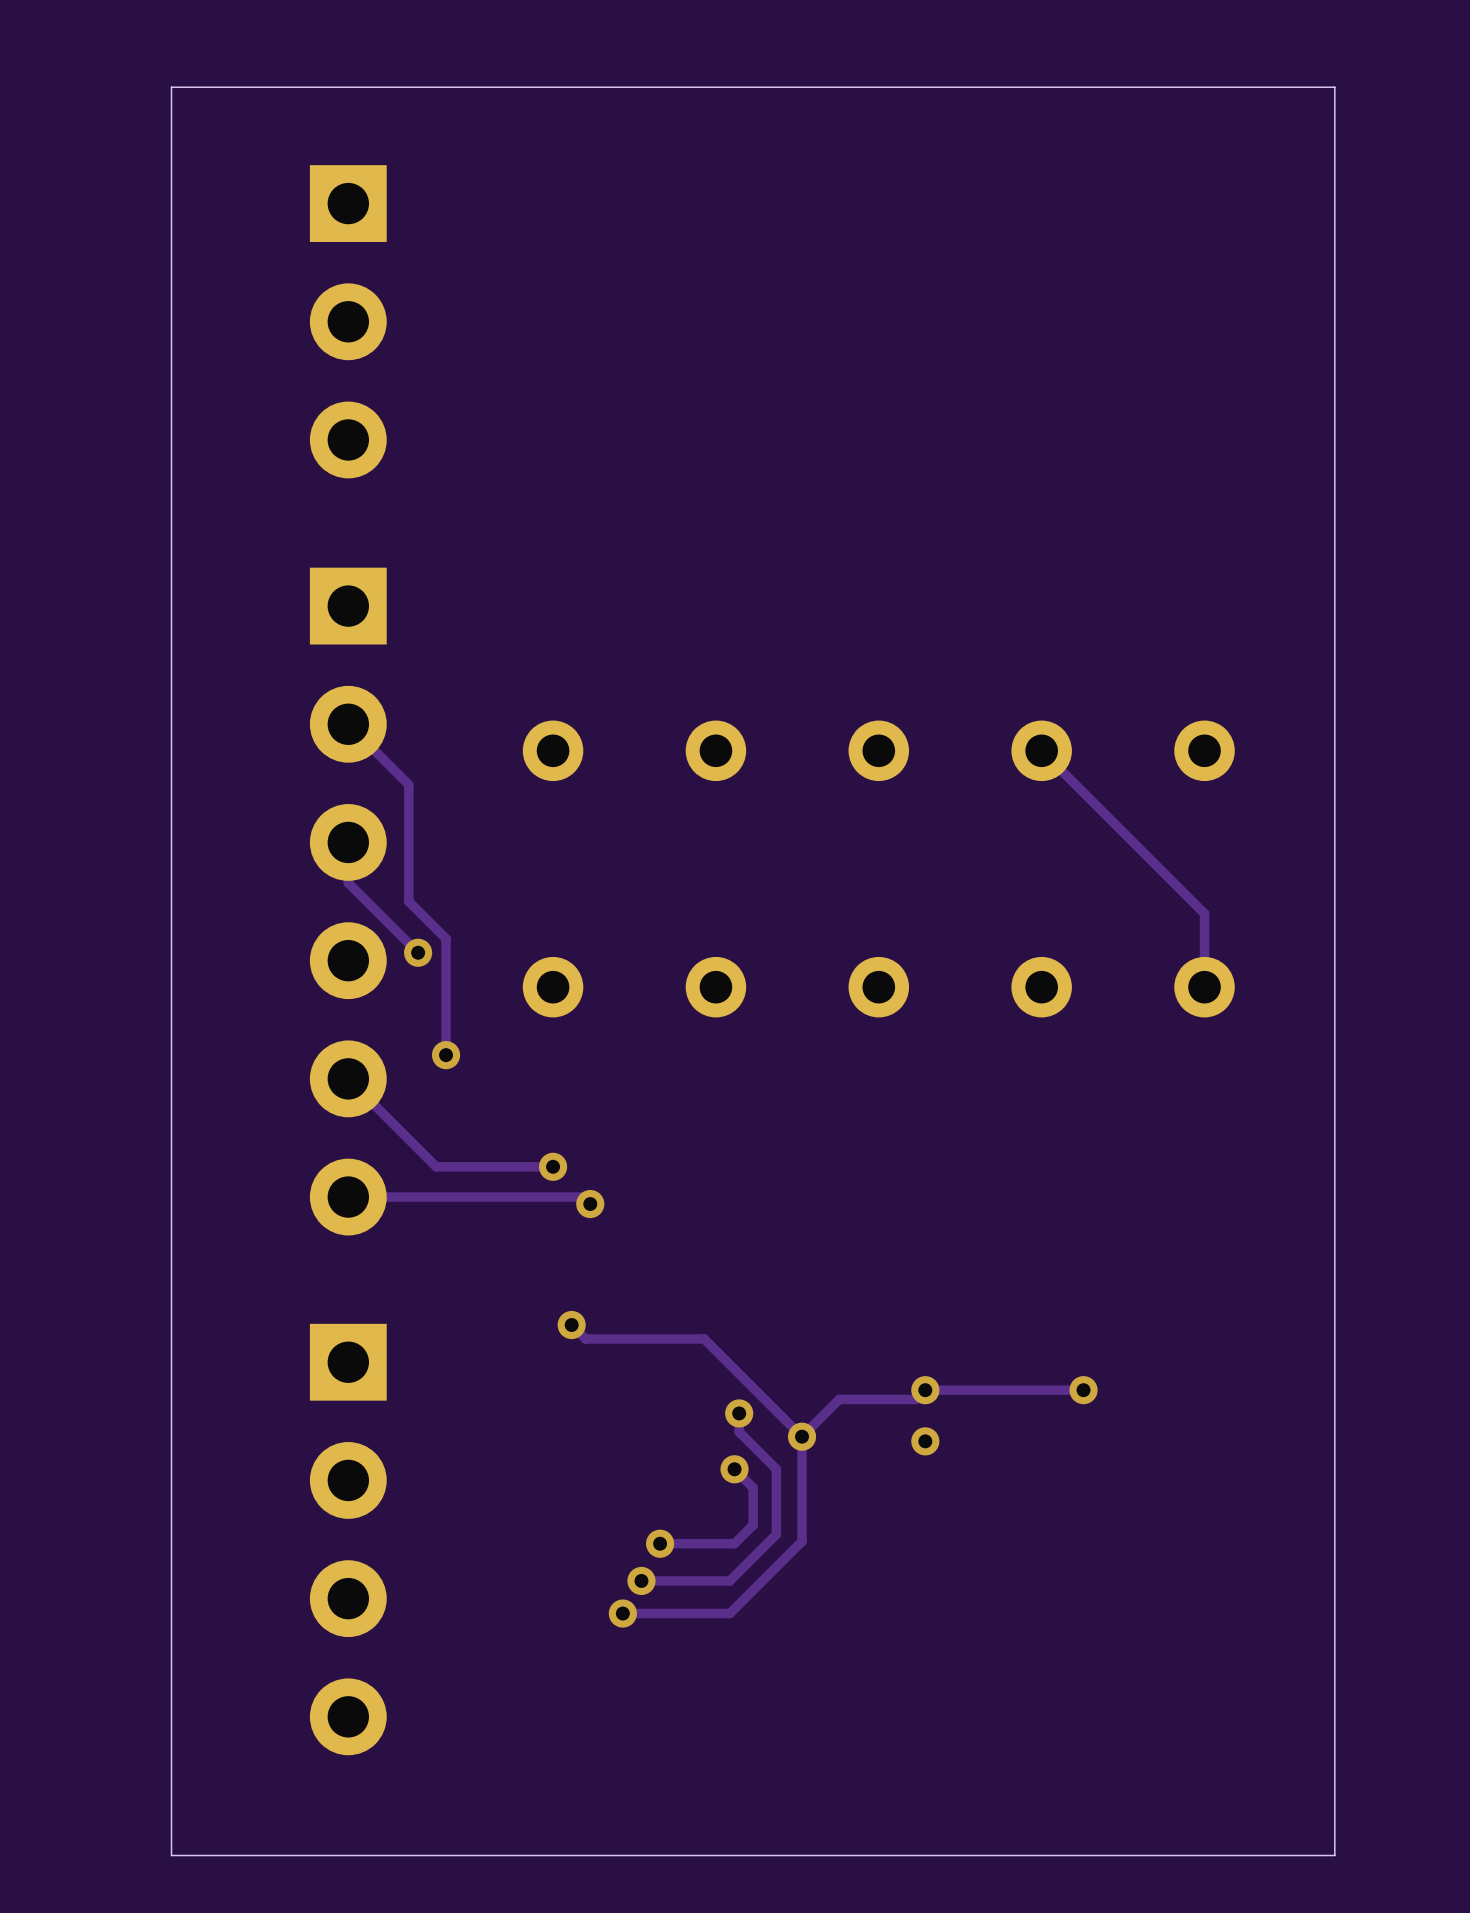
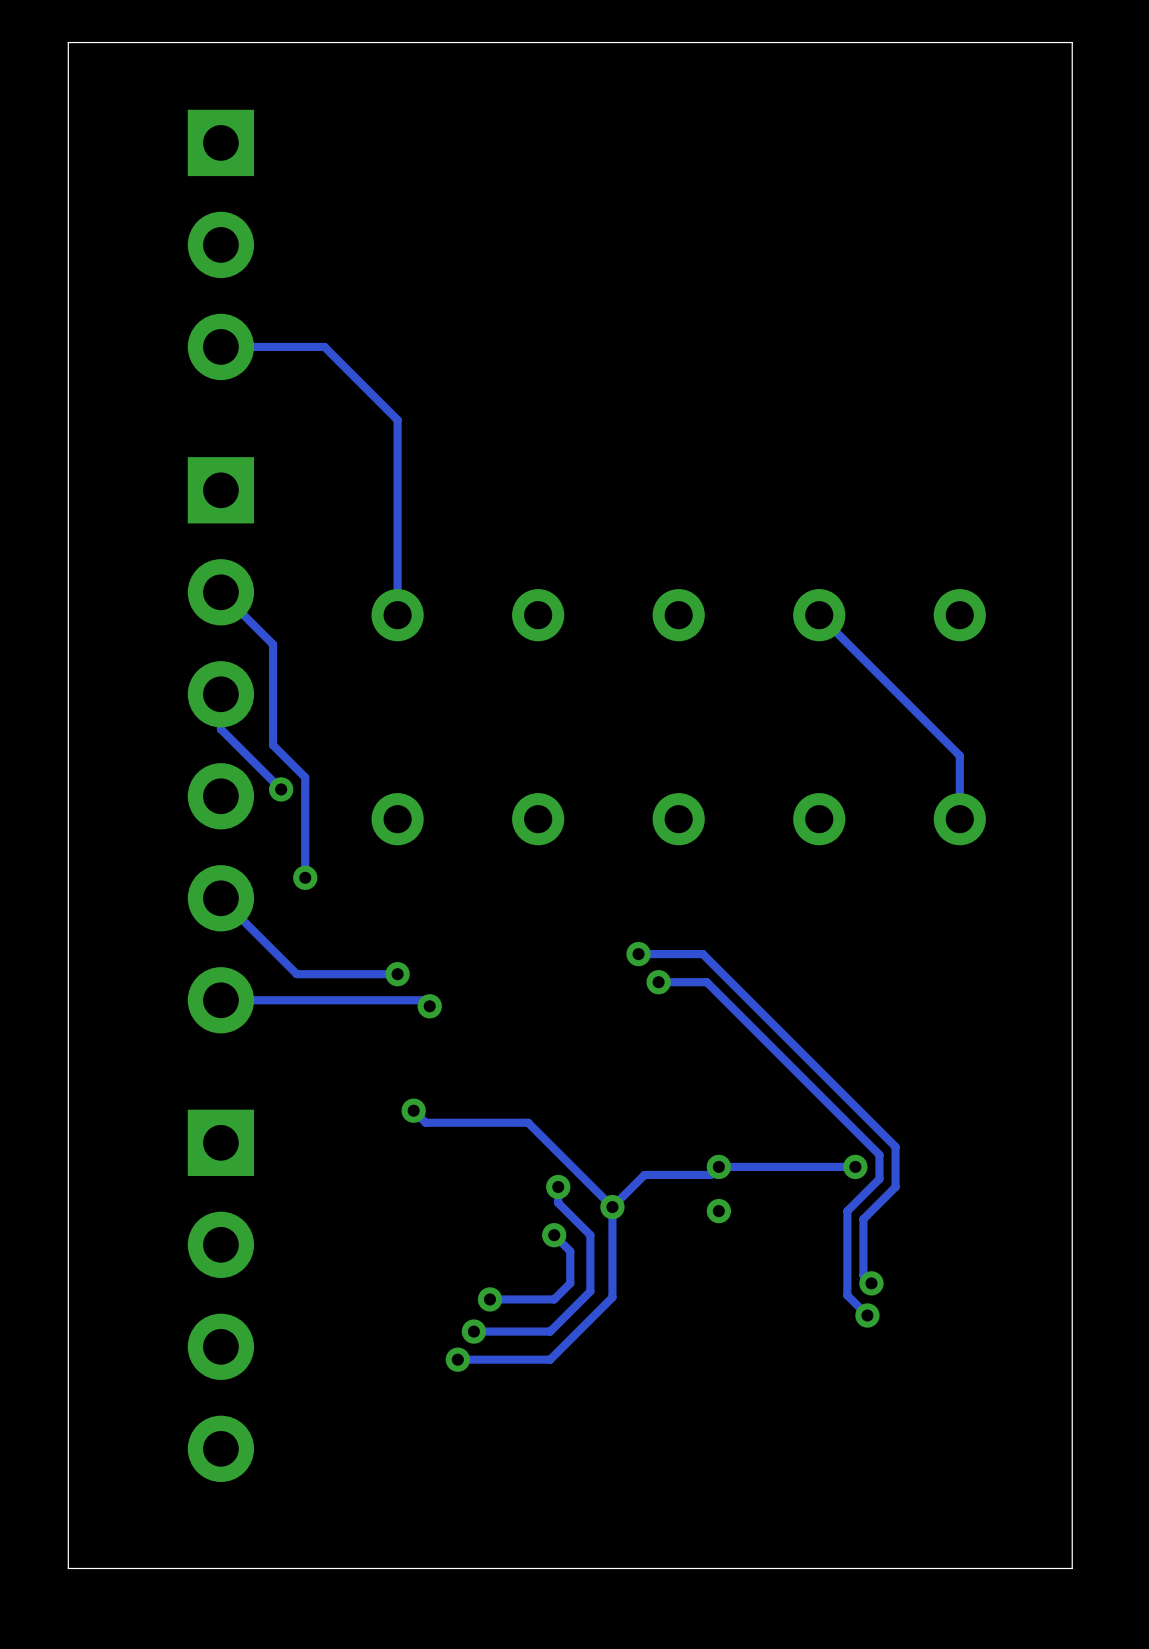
track: none -> (220, 346) (324, 346) (397, 420) (397, 615)
track: none -> (638, 954) (702, 954) (895, 1146) (895, 1187) (863, 1219) (863, 1275) (871, 1283)
via: none -> (638, 954)
track: none -> (658, 982) (706, 982) (879, 1154) (879, 1178) (847, 1211) (847, 1295) (867, 1315)
via: none -> (658, 982)
via: none -> (871, 1283)
via: none -> (867, 1315)

